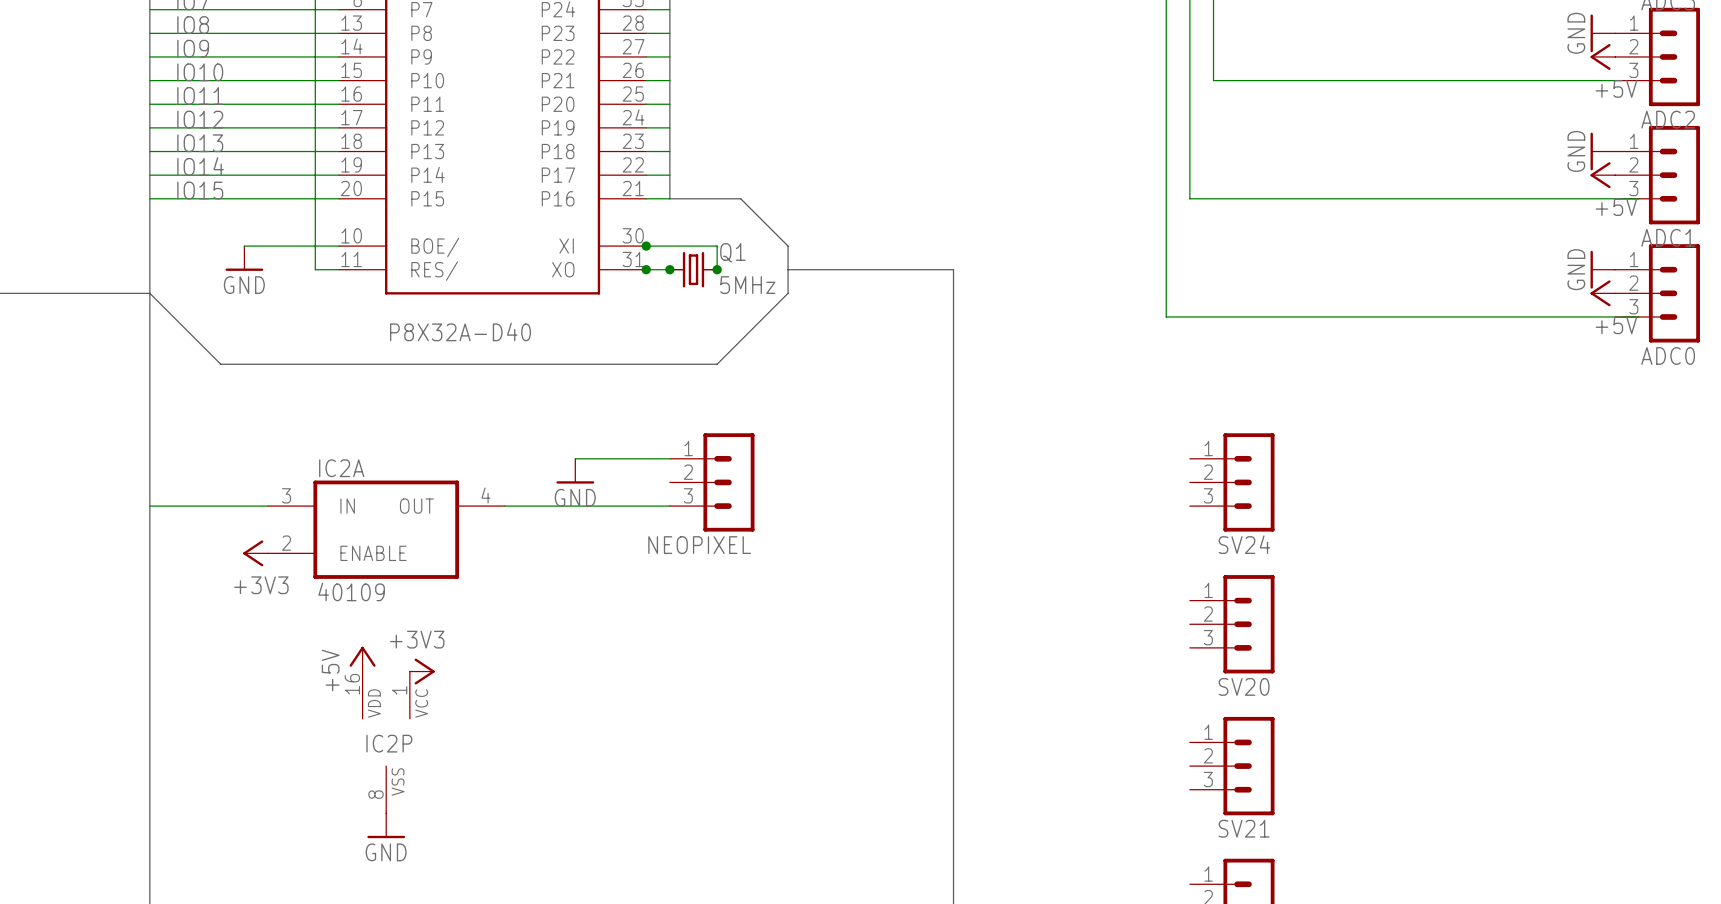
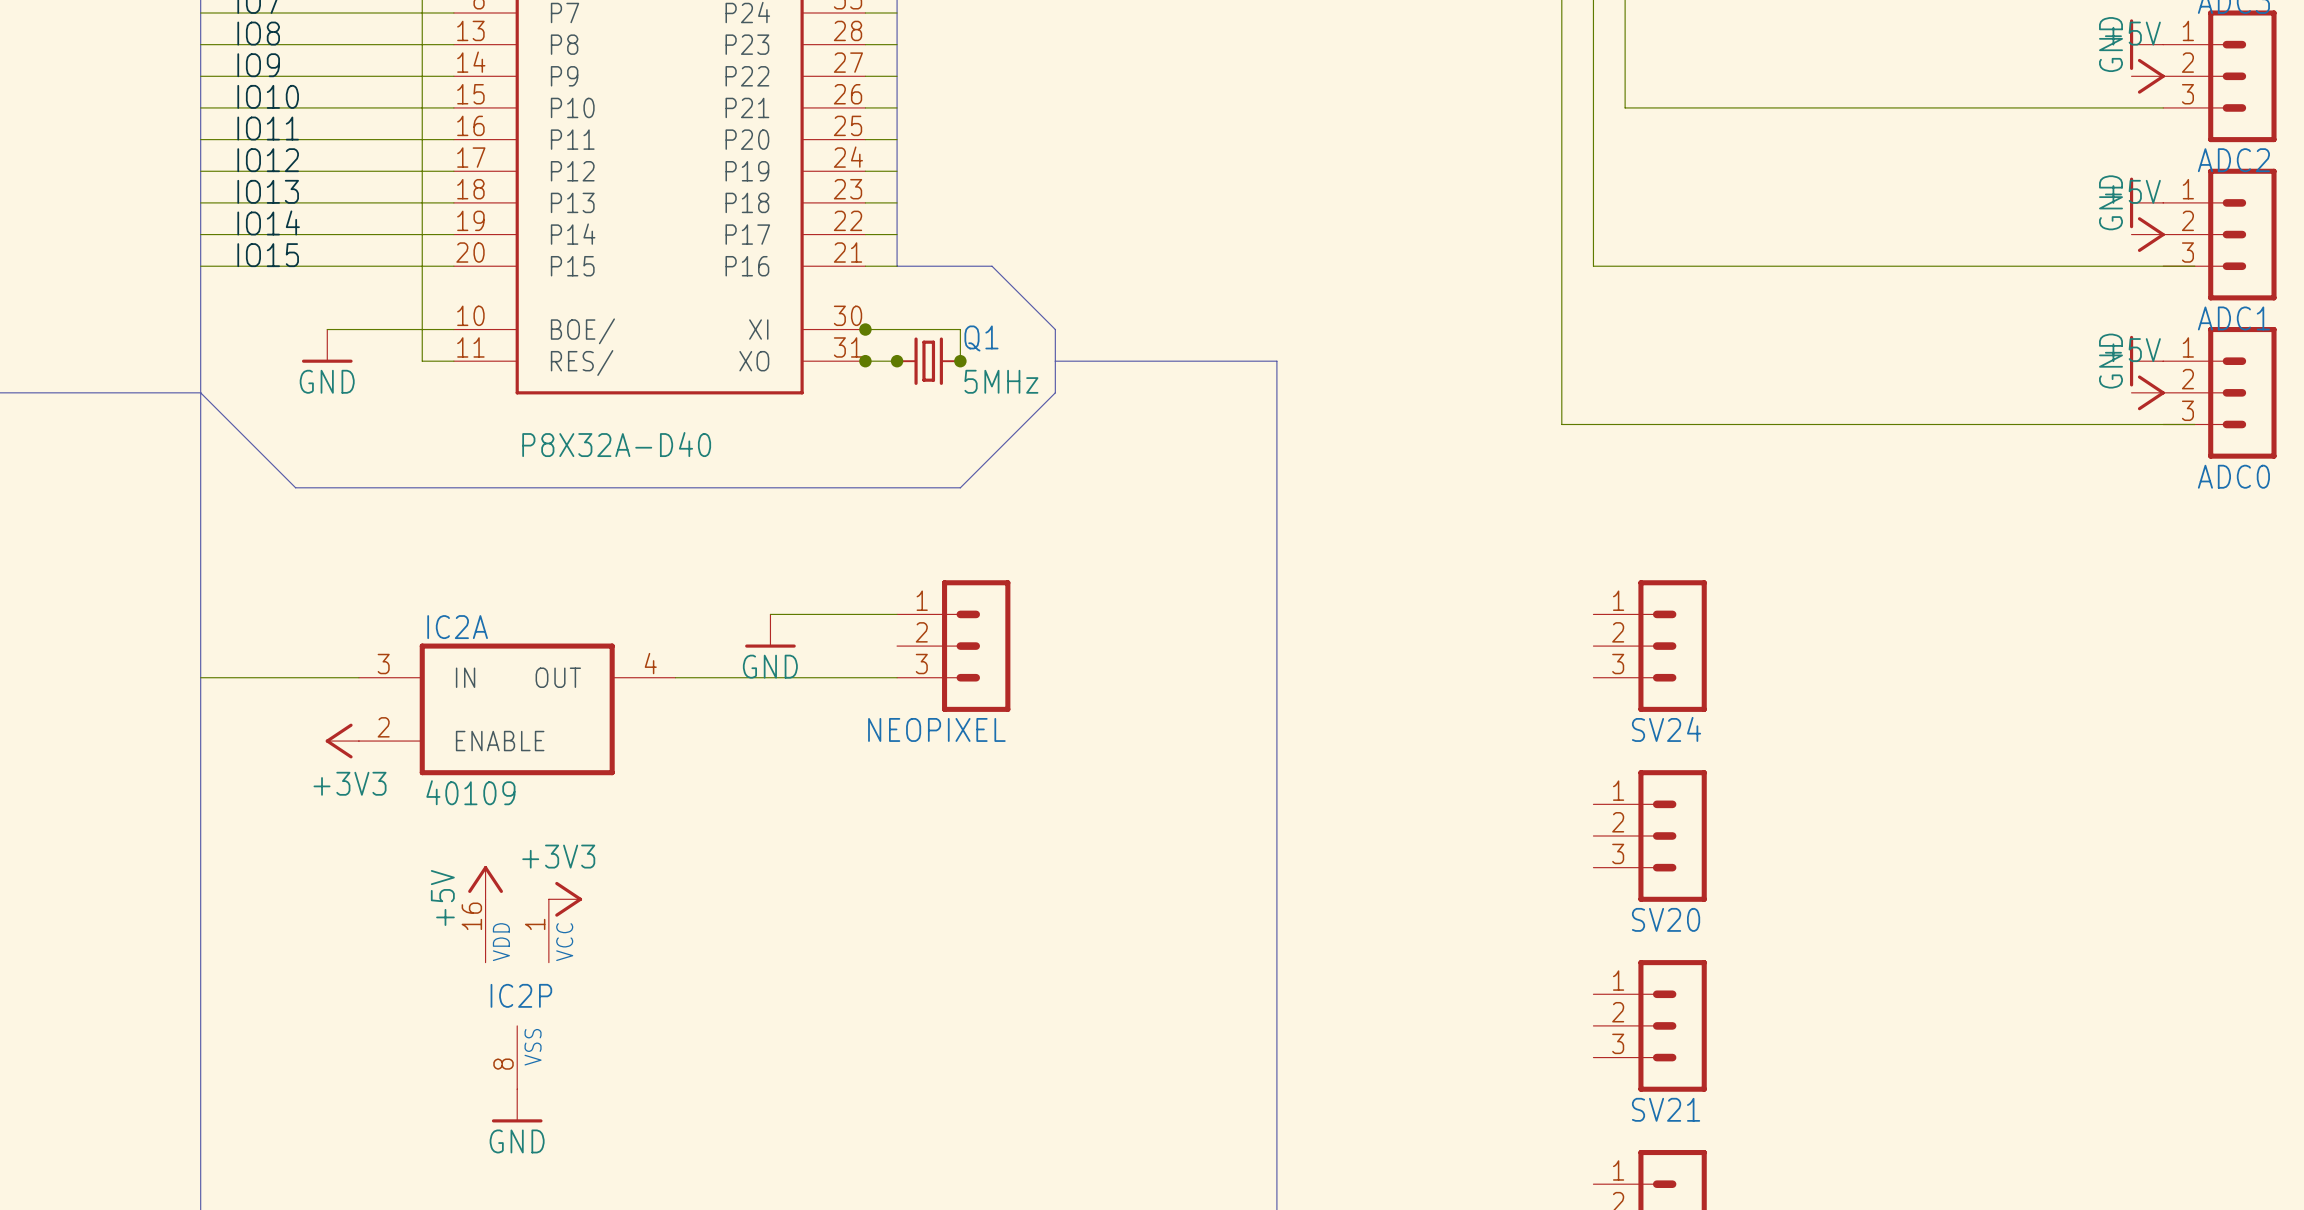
power symbol rotation: 0° (1600, 56) -> 180° (2151, 76)
power symbol rotation: 0° (1600, 175) -> 180° (2151, 234)
power symbol rotation: 0° (1600, 293) -> 180° (2151, 392)

